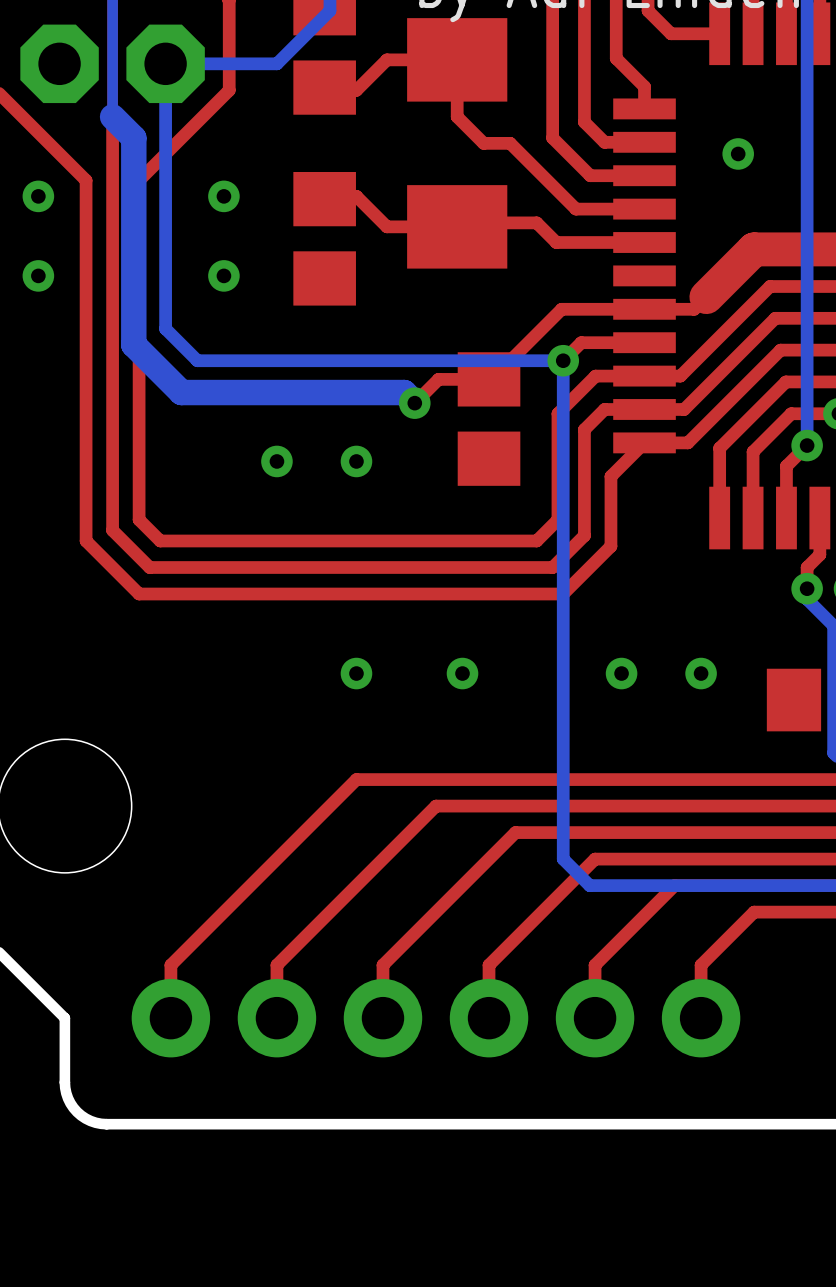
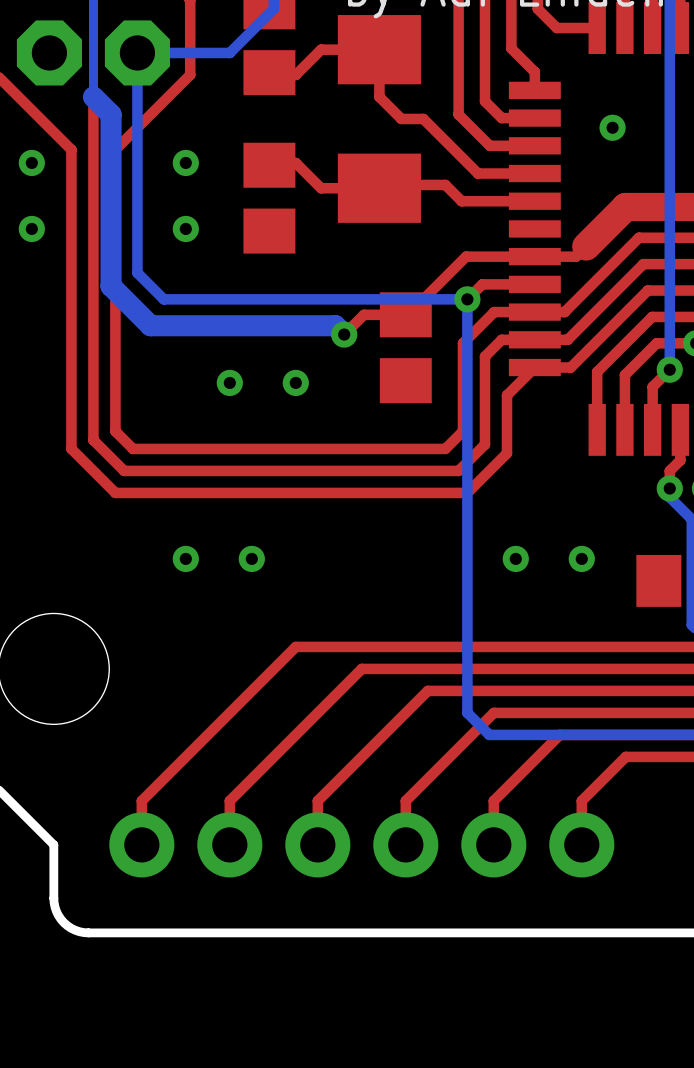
via: none -> (185, 558)
via position: (356, 673) -> (251, 558)
via: (462, 673) -> none

